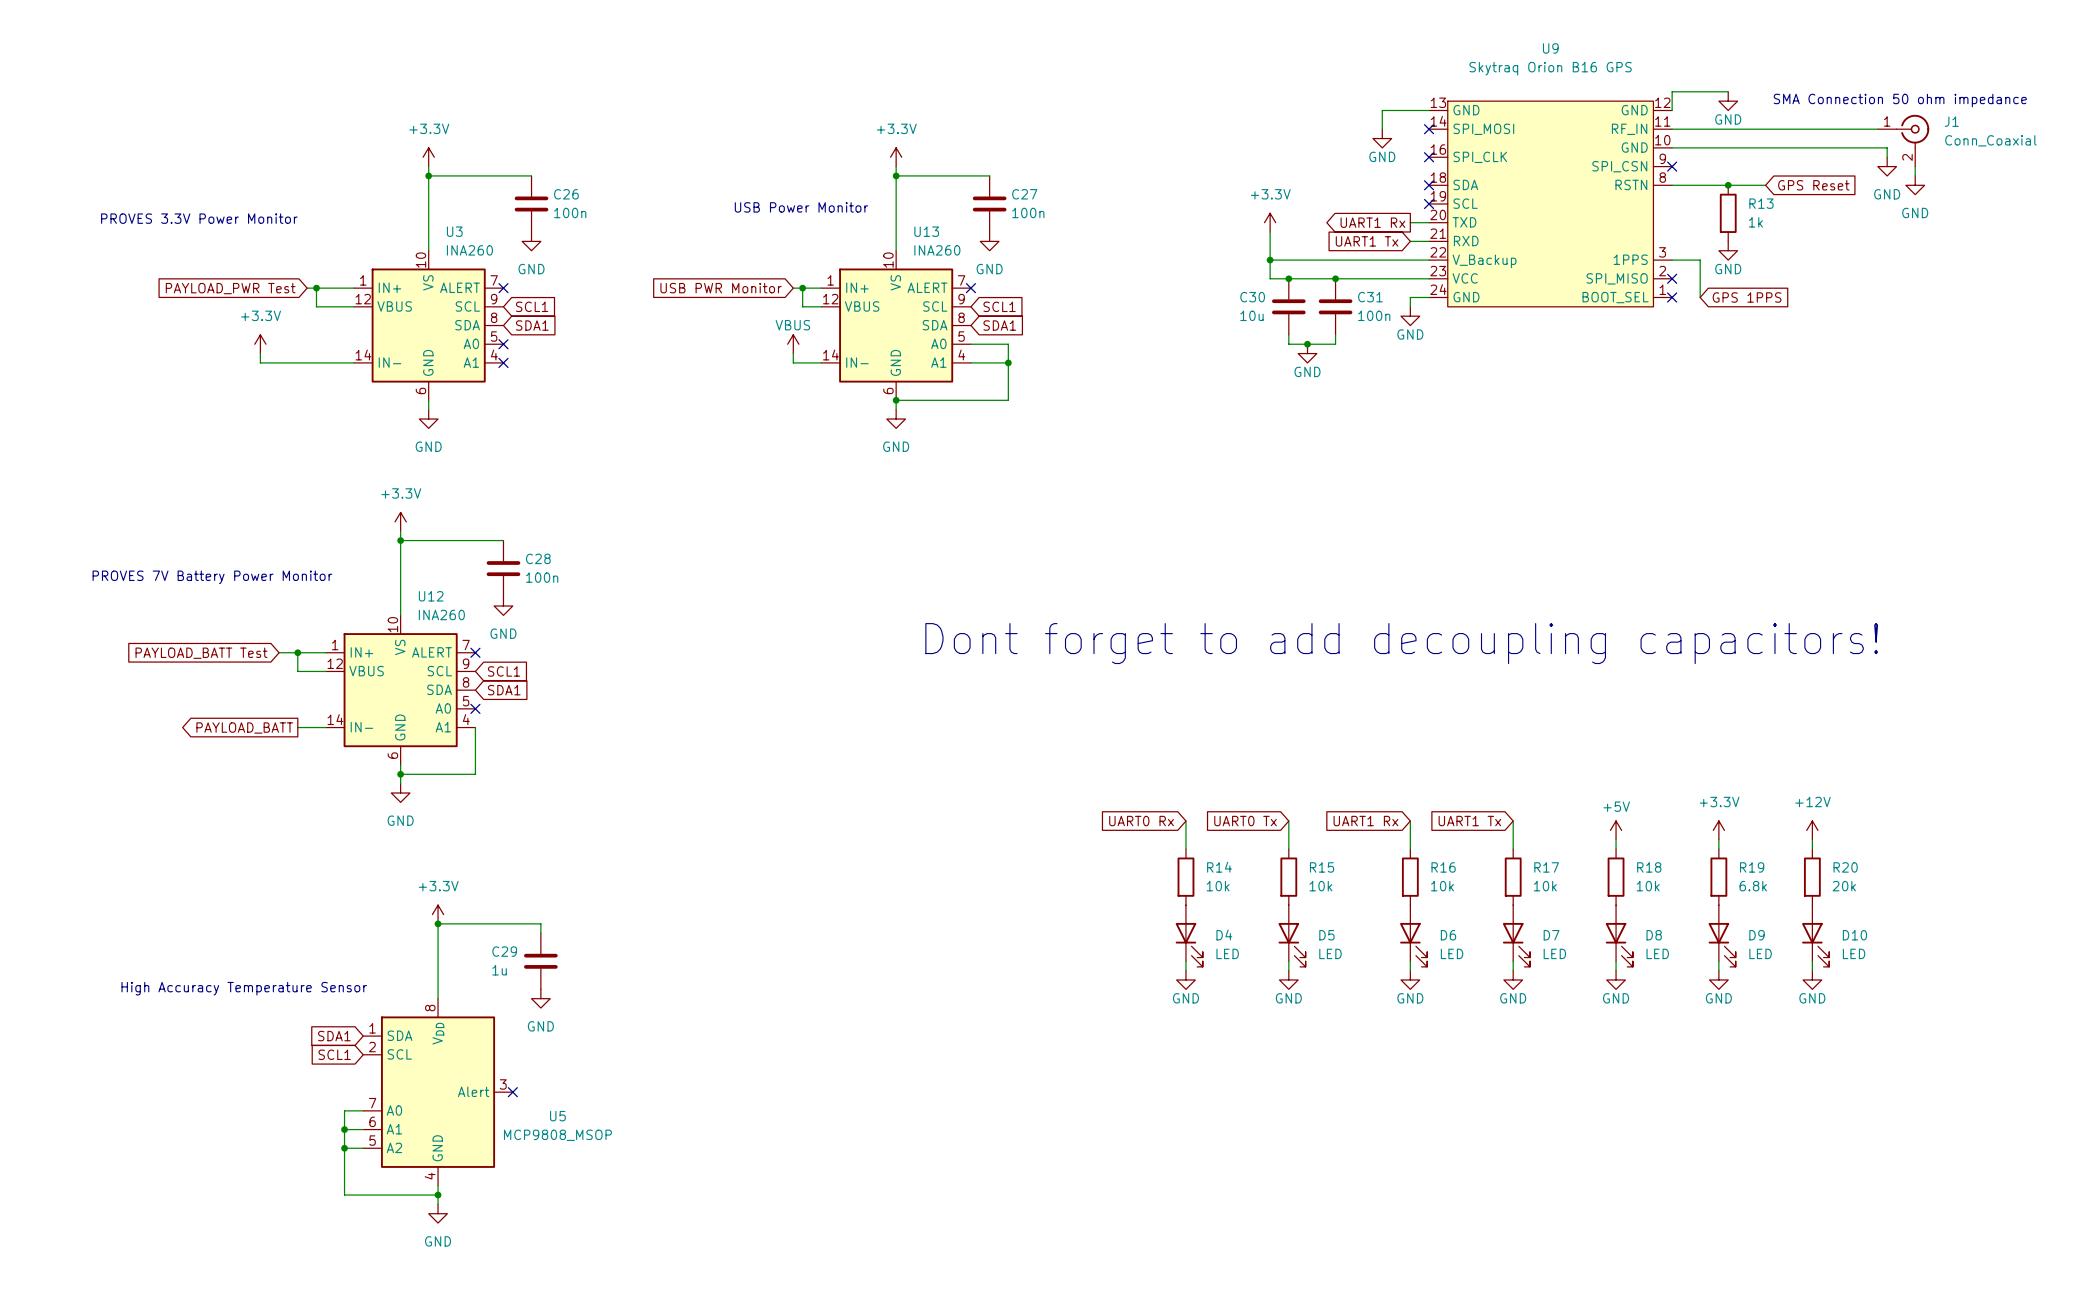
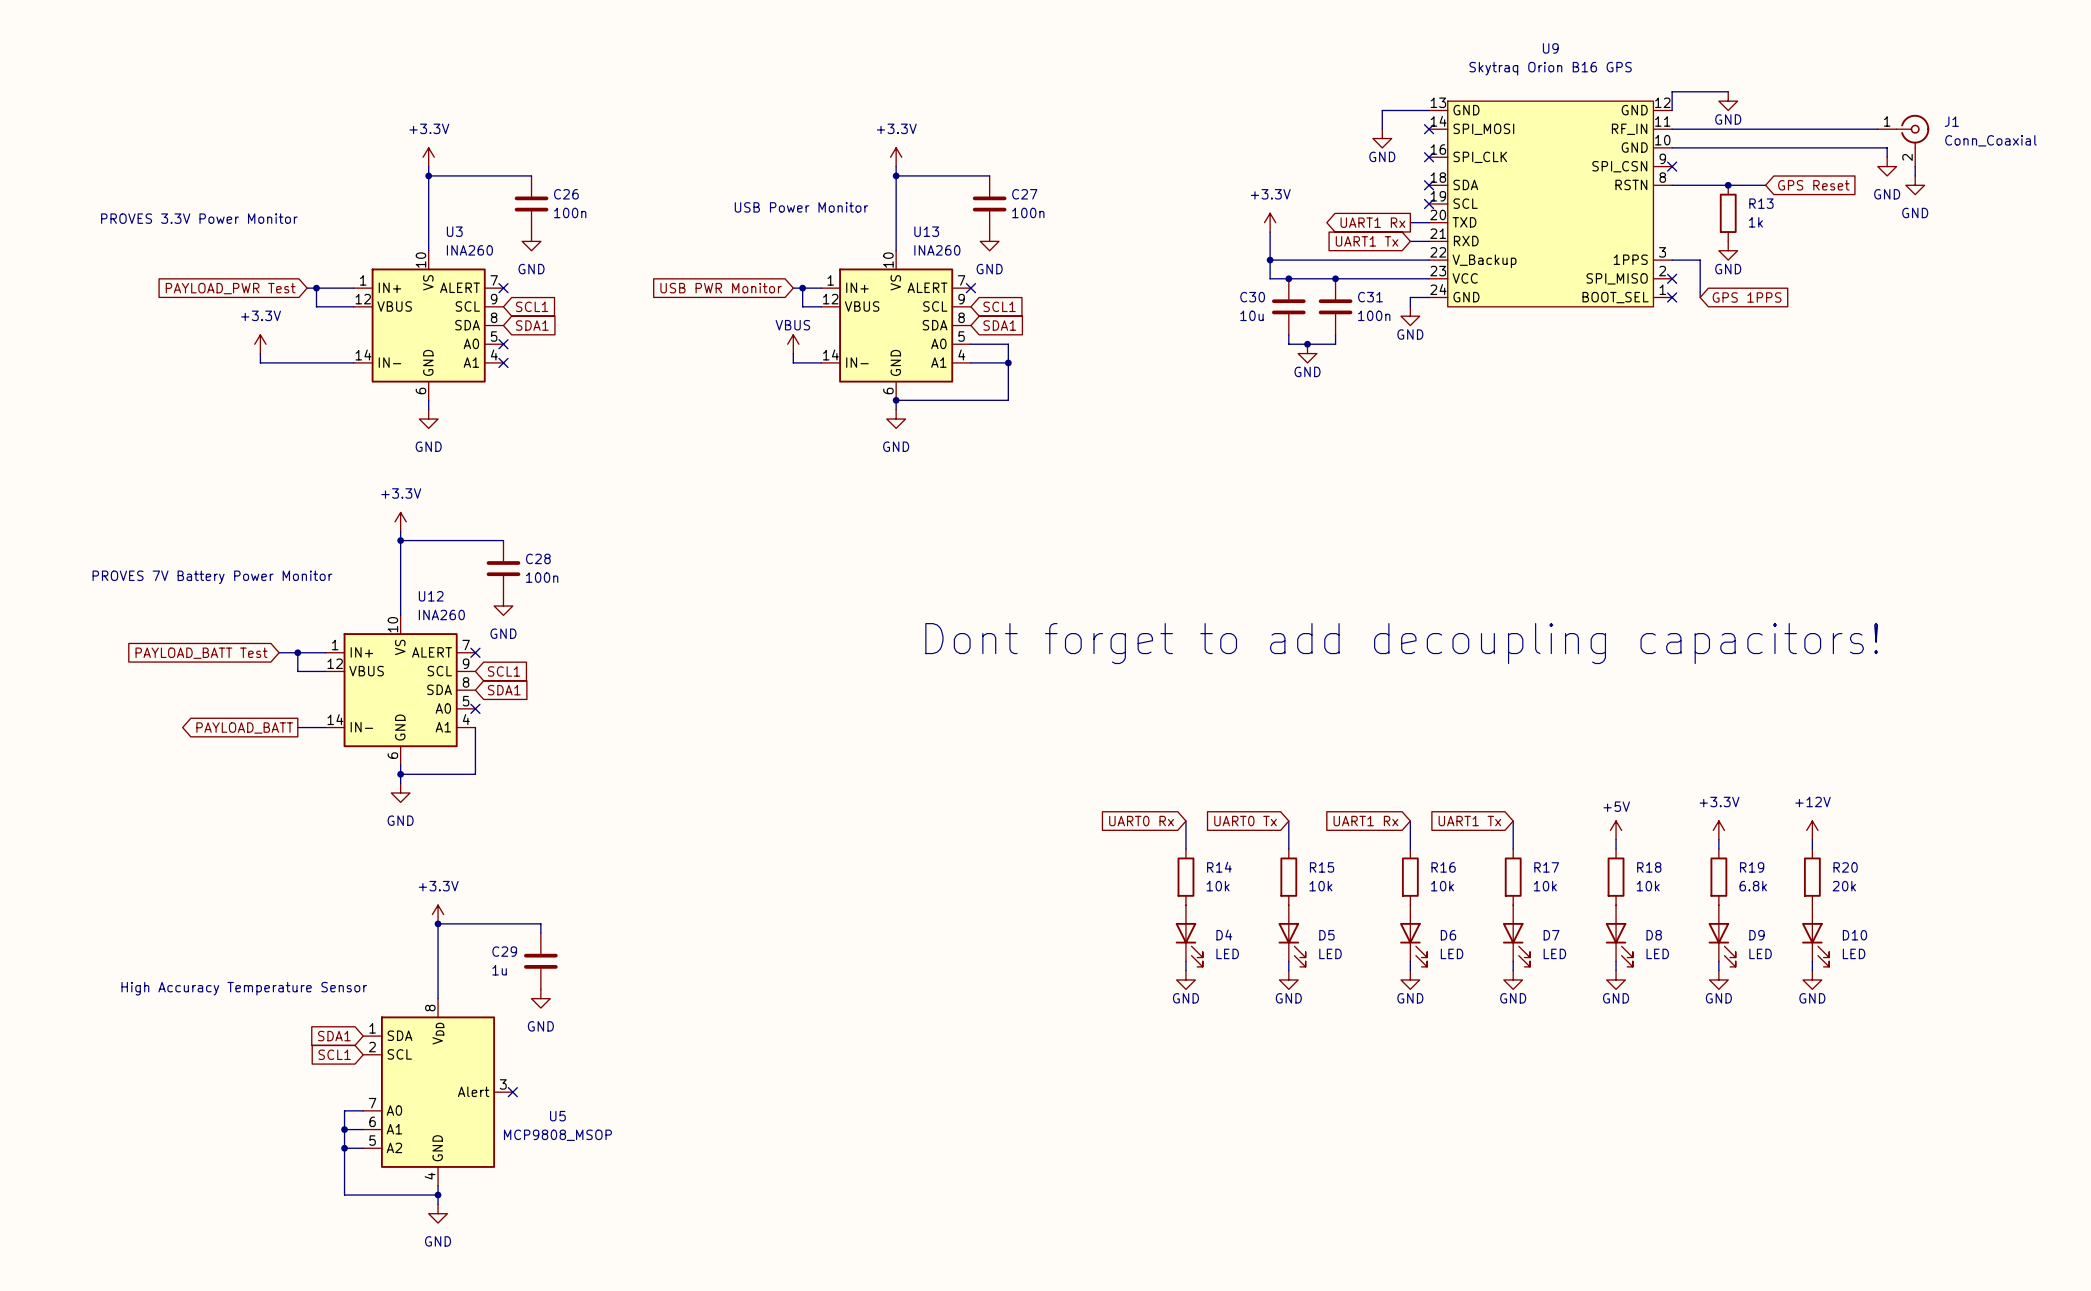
text: SMA Connection 50 ohm impedance (1900, 100) -> none

